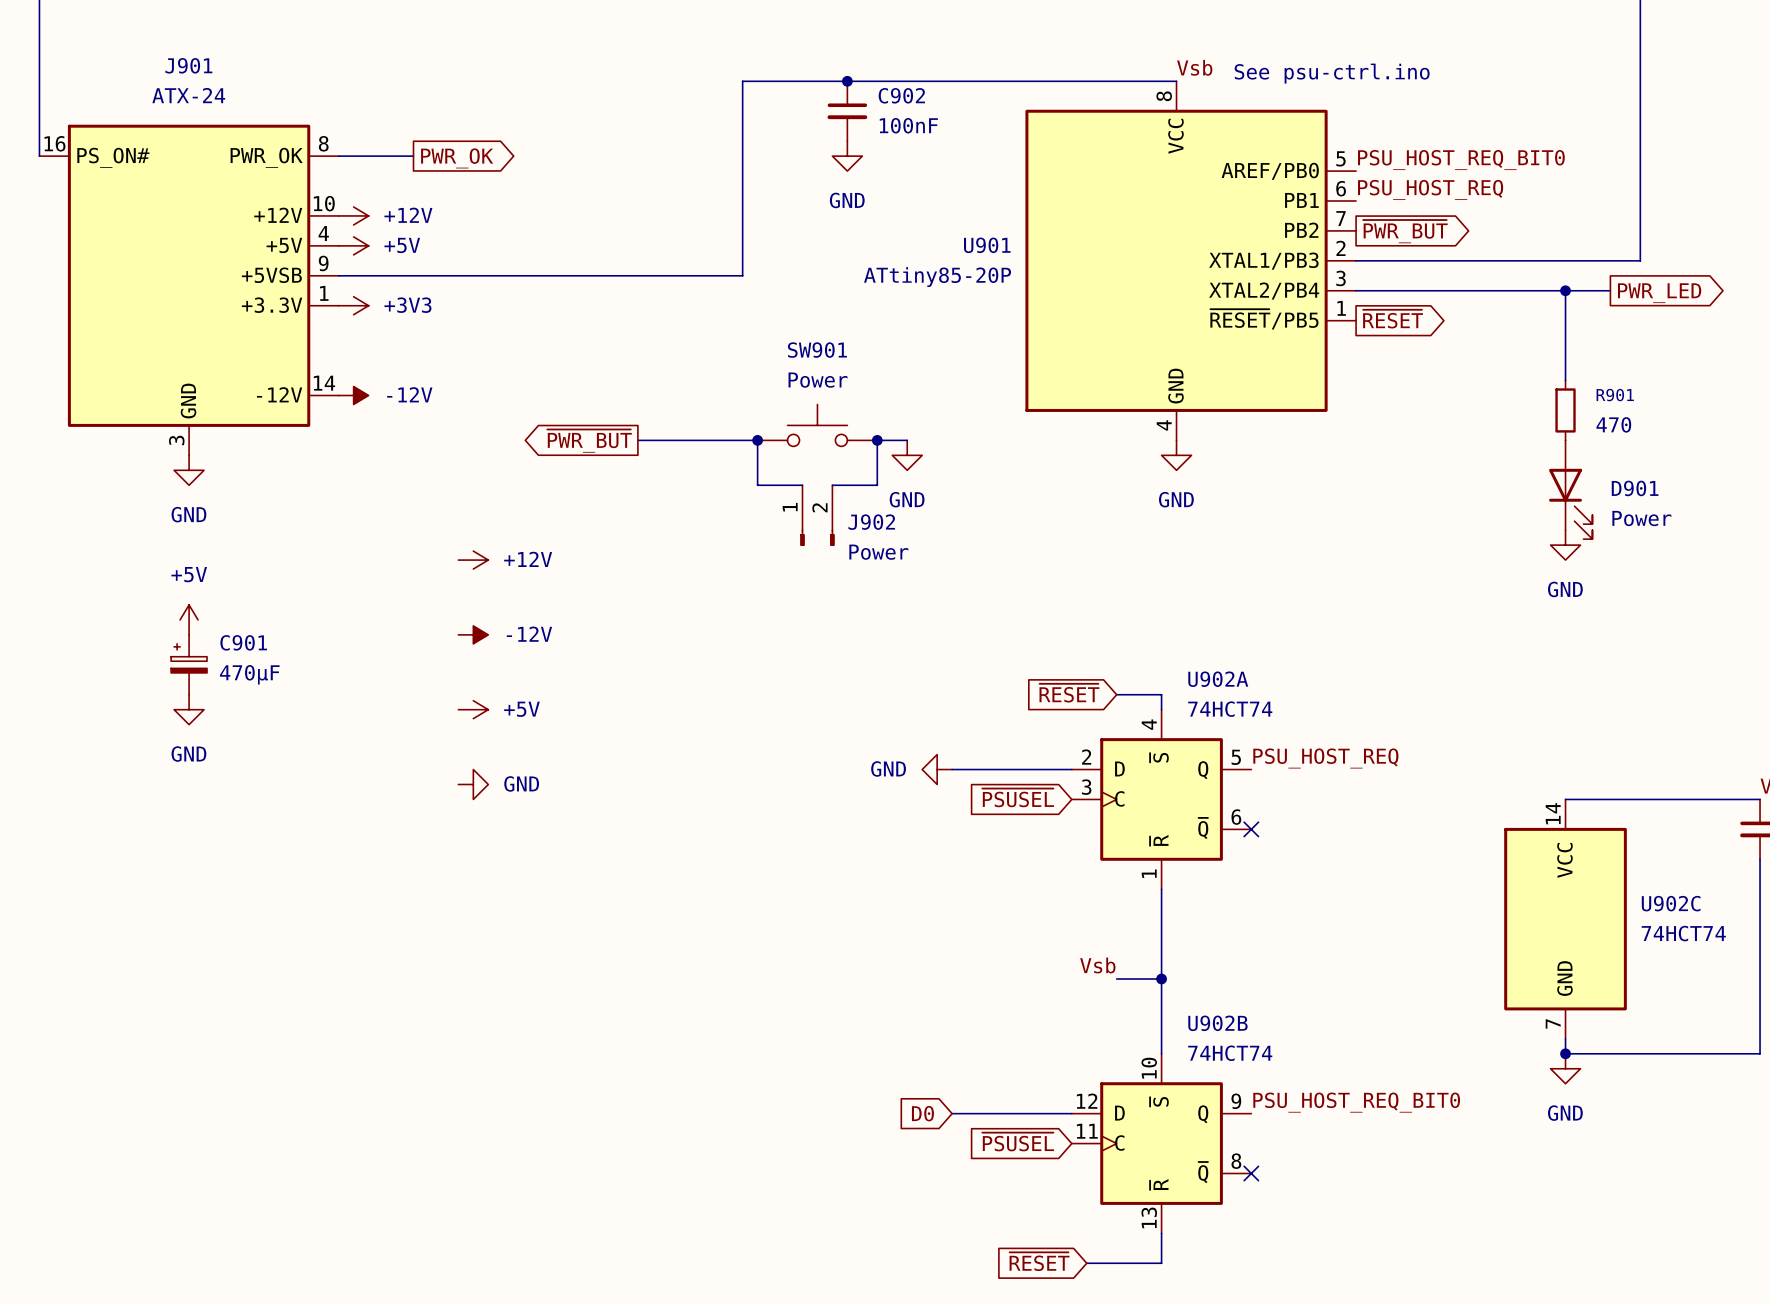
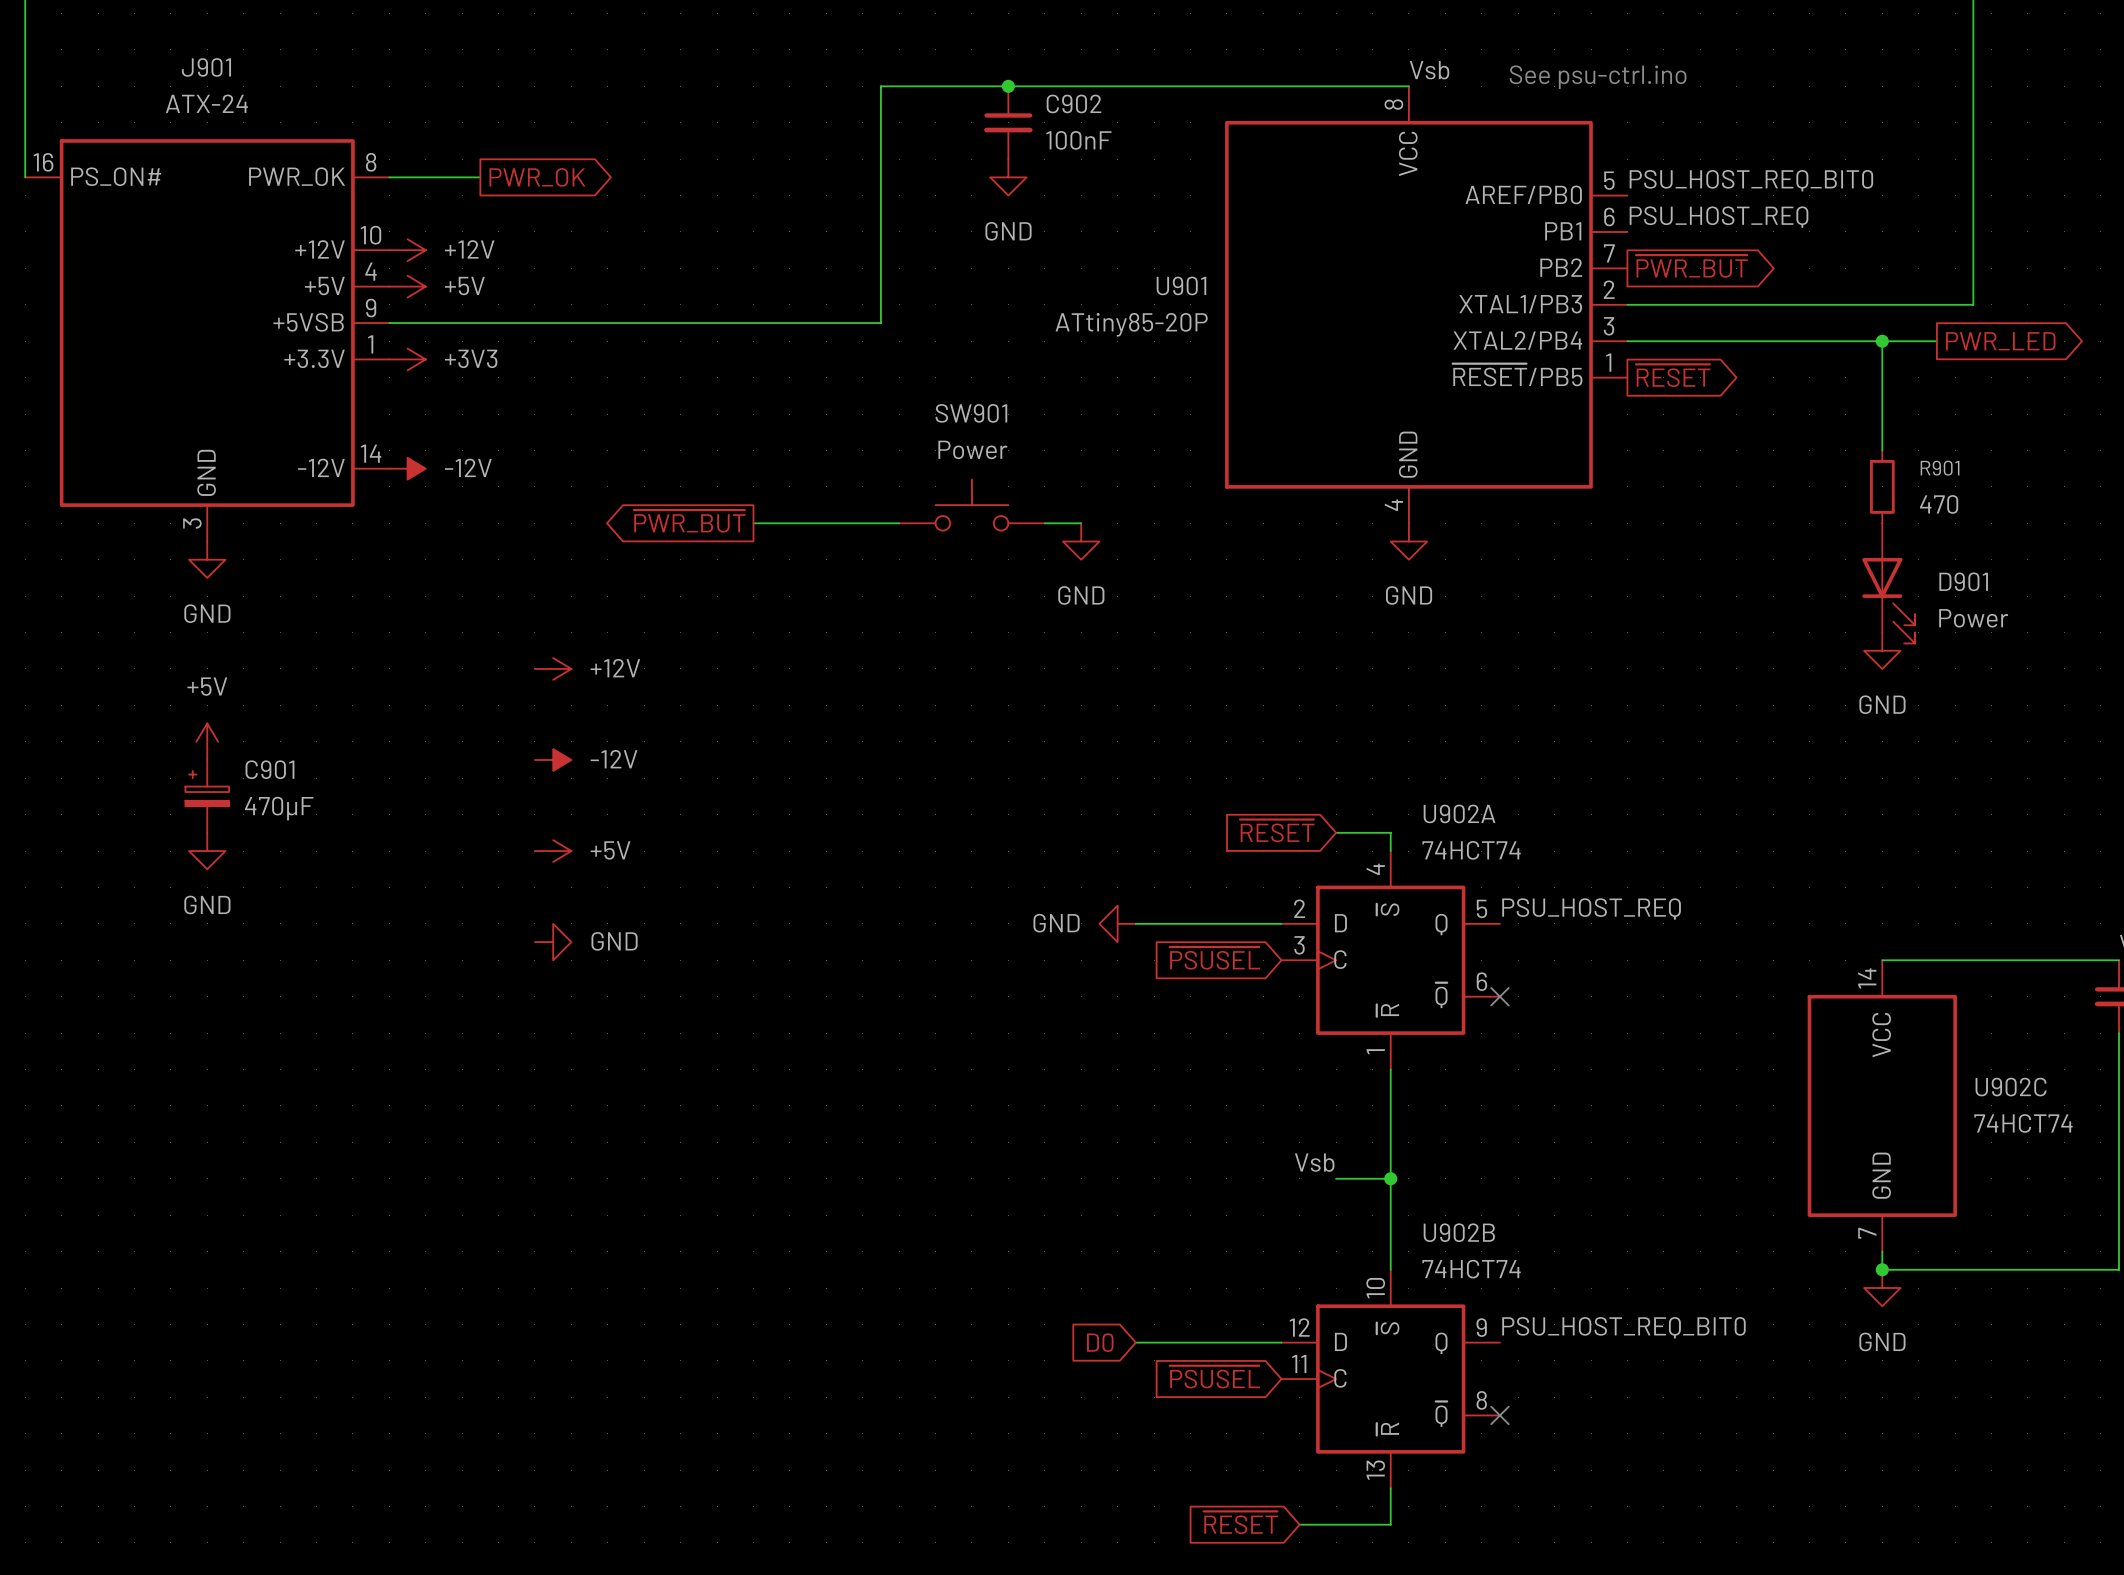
wire: (757, 440) (757, 485) (802, 485) -> none
junction: (757, 440) -> none
wire: (877, 440) (877, 485) (832, 485) -> none
junction: (877, 440) -> none
J902: Power (817, 515) -> none

